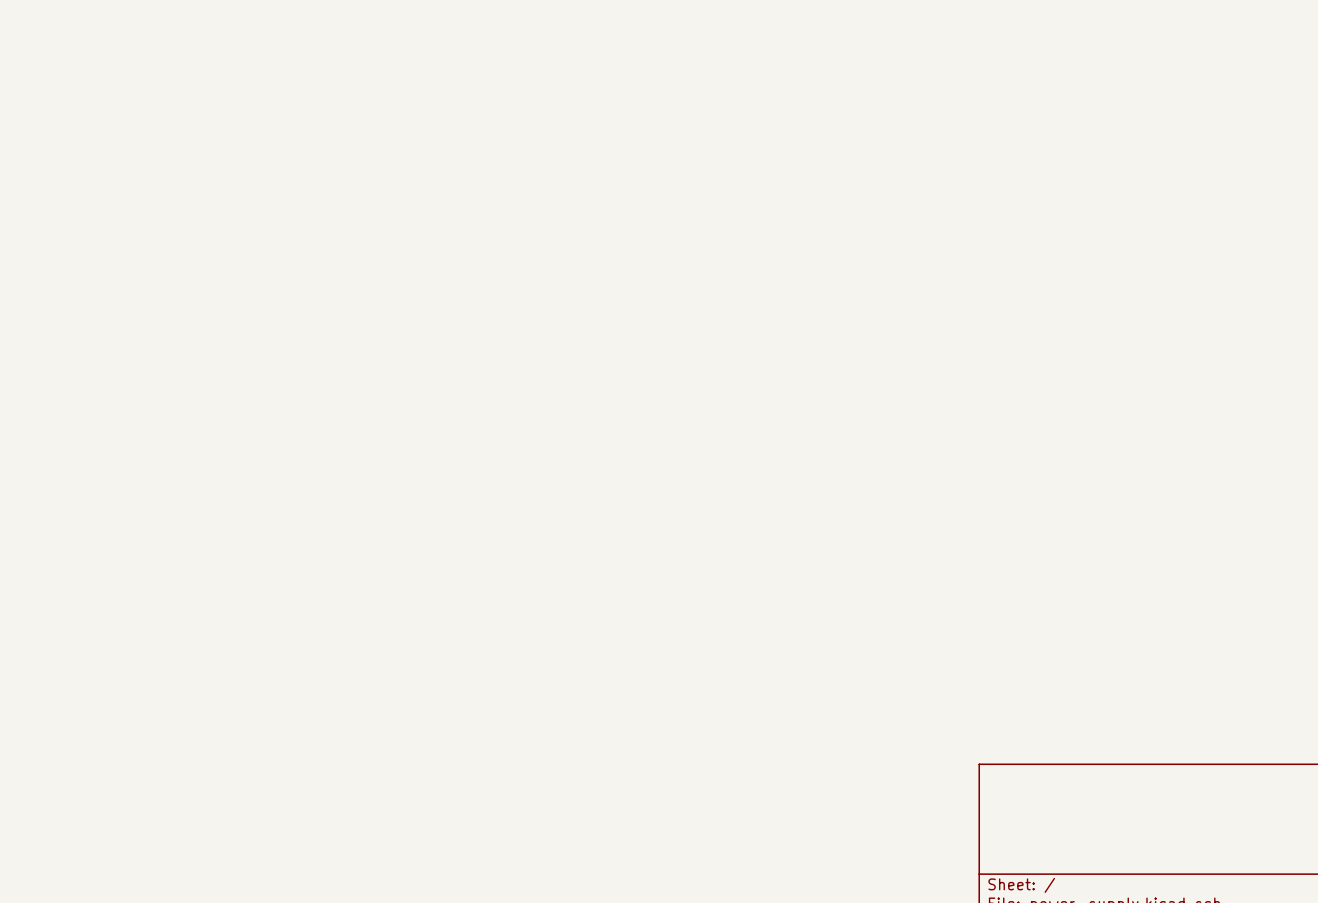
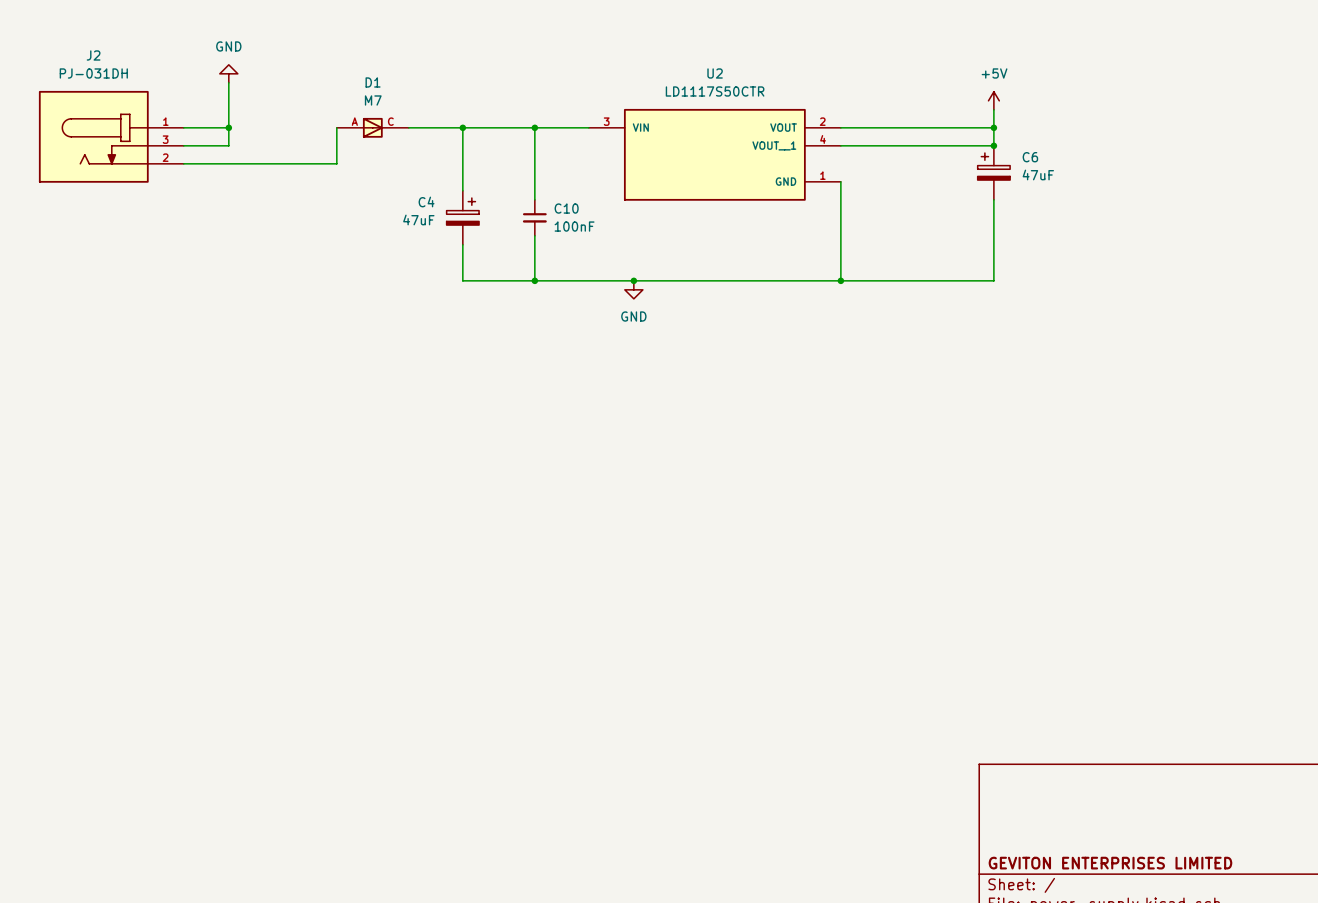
power symbol: none -> GND (228, 73)
wire: none -> (228, 82) (228, 145) (183, 145)
power symbol: none -> +5V (993, 100)
wire: none -> (993, 109) (993, 145) (840, 145)
wire: none -> (183, 127) (228, 127)
junction: none -> (228, 127)
wire: none -> (336, 127) (336, 163) (183, 163)
D1: none -> M7 (372, 127)
wire: none -> (408, 127) (588, 127)
wire: none -> (462, 127) (462, 190)
junction: none -> (462, 127)
wire: none -> (534, 127) (534, 199)
junction: none -> (534, 127)
wire: none -> (840, 127) (993, 127)
junction: none -> (993, 127)
J2: none -> PJ-031DH (111, 136)
junction: none -> (993, 145)
U2: none -> LD1117S50CTR (714, 154)
C6: none -> 47uF (993, 172)
wire: none -> (840, 181) (840, 280)
wire: none -> (993, 199) (993, 280) (462, 280) (462, 244)
C4: none -> 47uF (462, 217)
C10: none -> 100nF (534, 217)
wire: none -> (534, 235) (534, 280)
junction: none -> (534, 280)
junction: none -> (633, 280)
junction: none -> (840, 280)
power symbol: none -> GND (633, 289)
title block: none -> GEVITON ENTERPRISES LIMITED (1110, 863)

